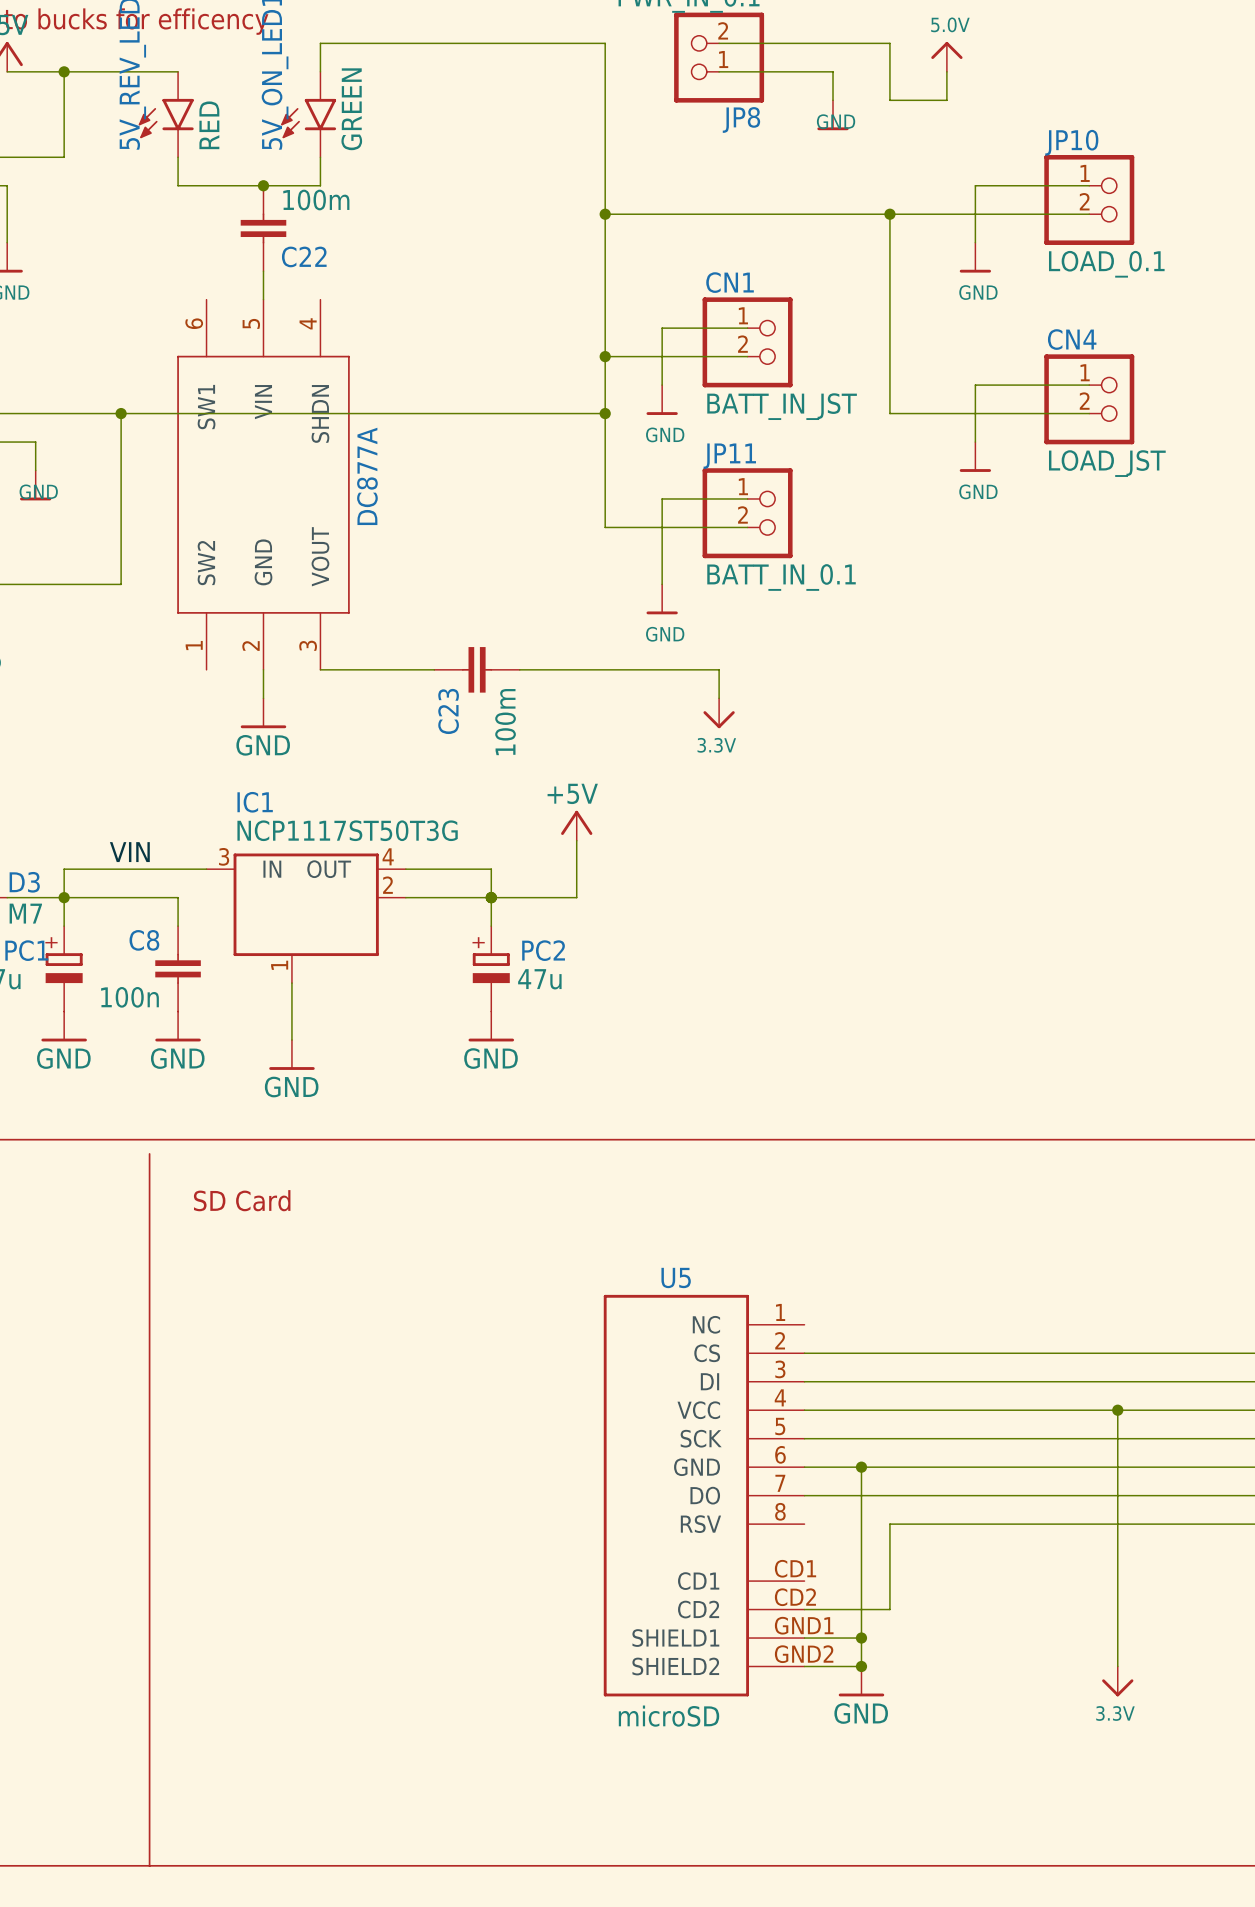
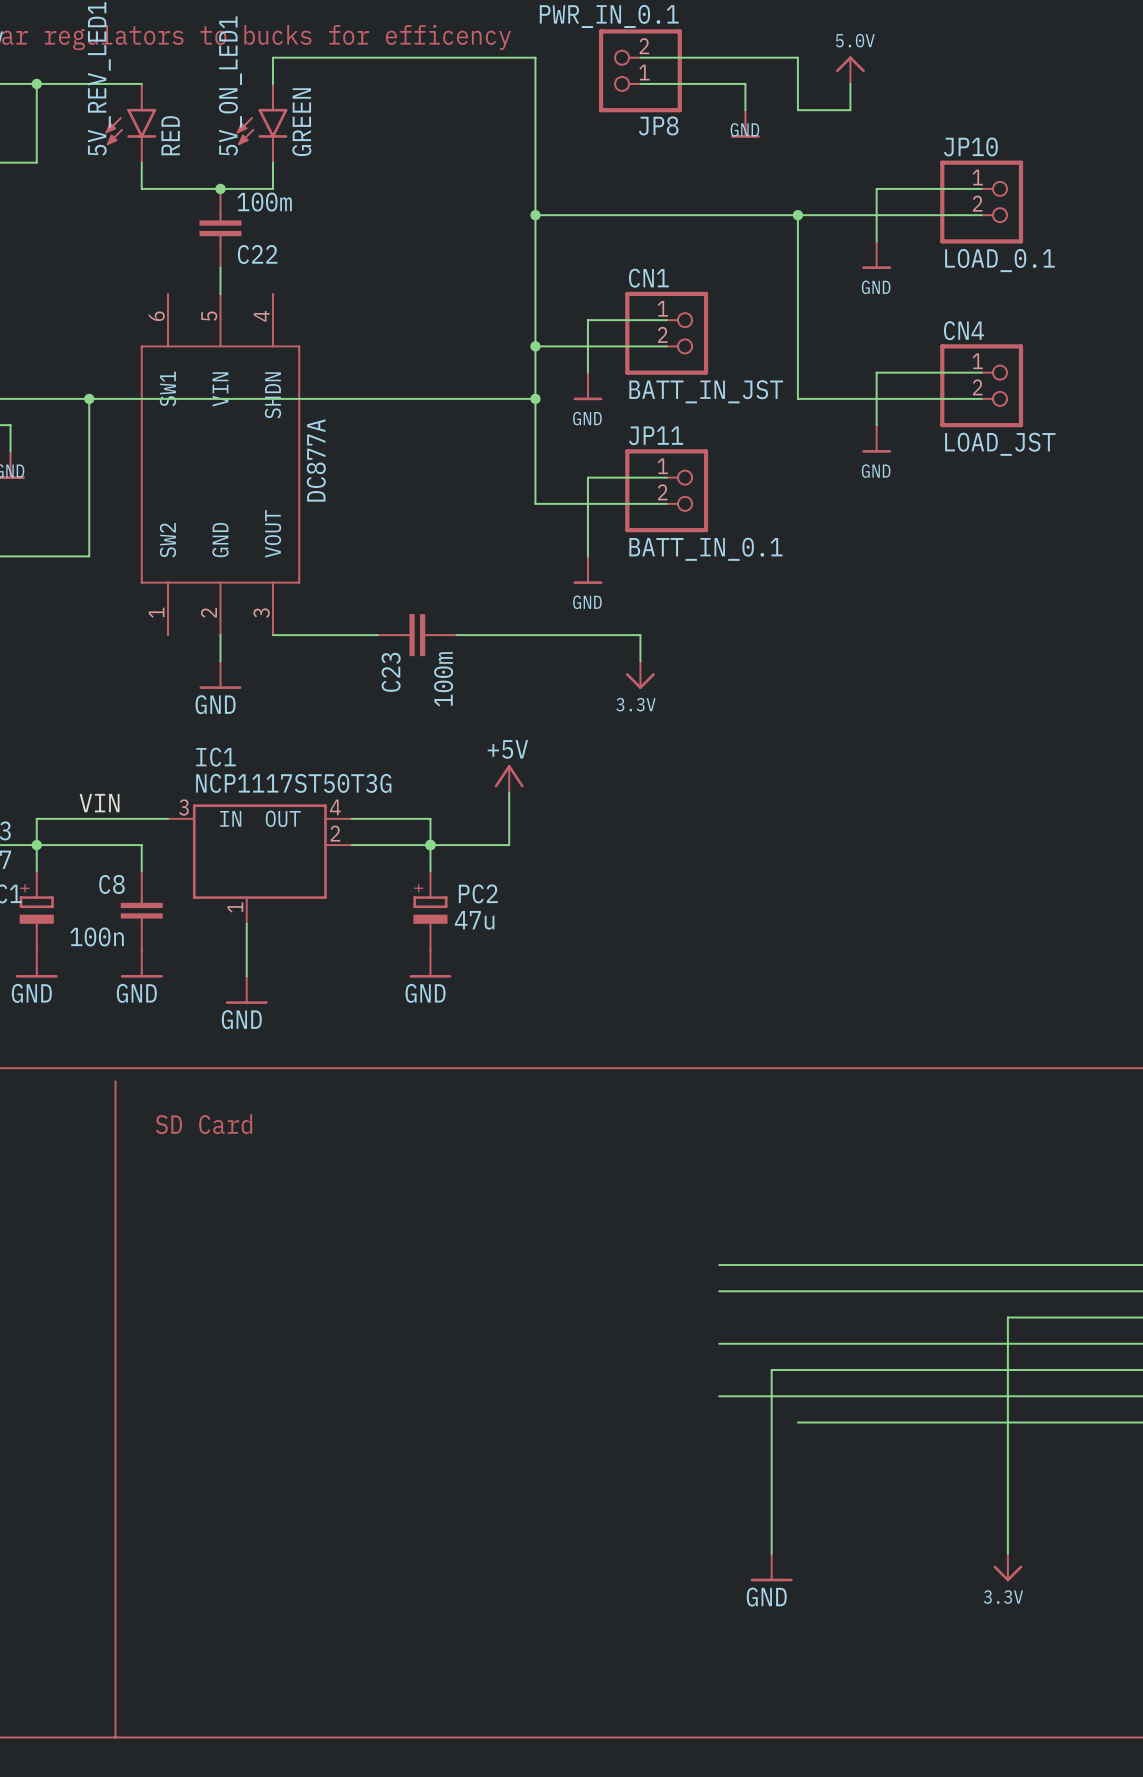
wire: (804, 1410) (1117, 1410) -> none
junction: (1117, 1410) -> none
wire: (804, 1467) (861, 1467) -> none
junction: (861, 1467) -> none
U5: microSD (704, 1495) -> none
wire: (889, 1524) (889, 1609) (804, 1609) -> none
wire: (804, 1638) (861, 1638) -> none
junction: (861, 1638) -> none
wire: (804, 1666) (861, 1666) -> none
junction: (861, 1666) -> none

